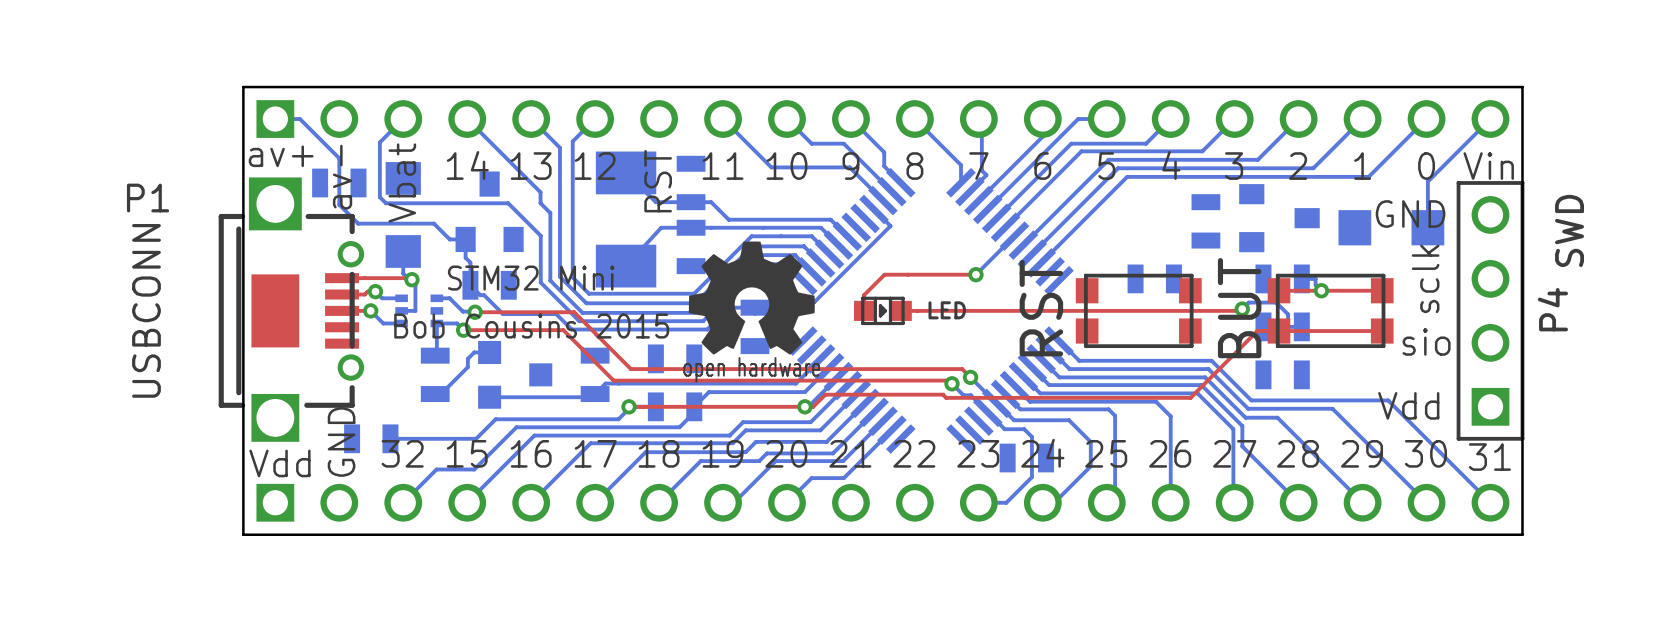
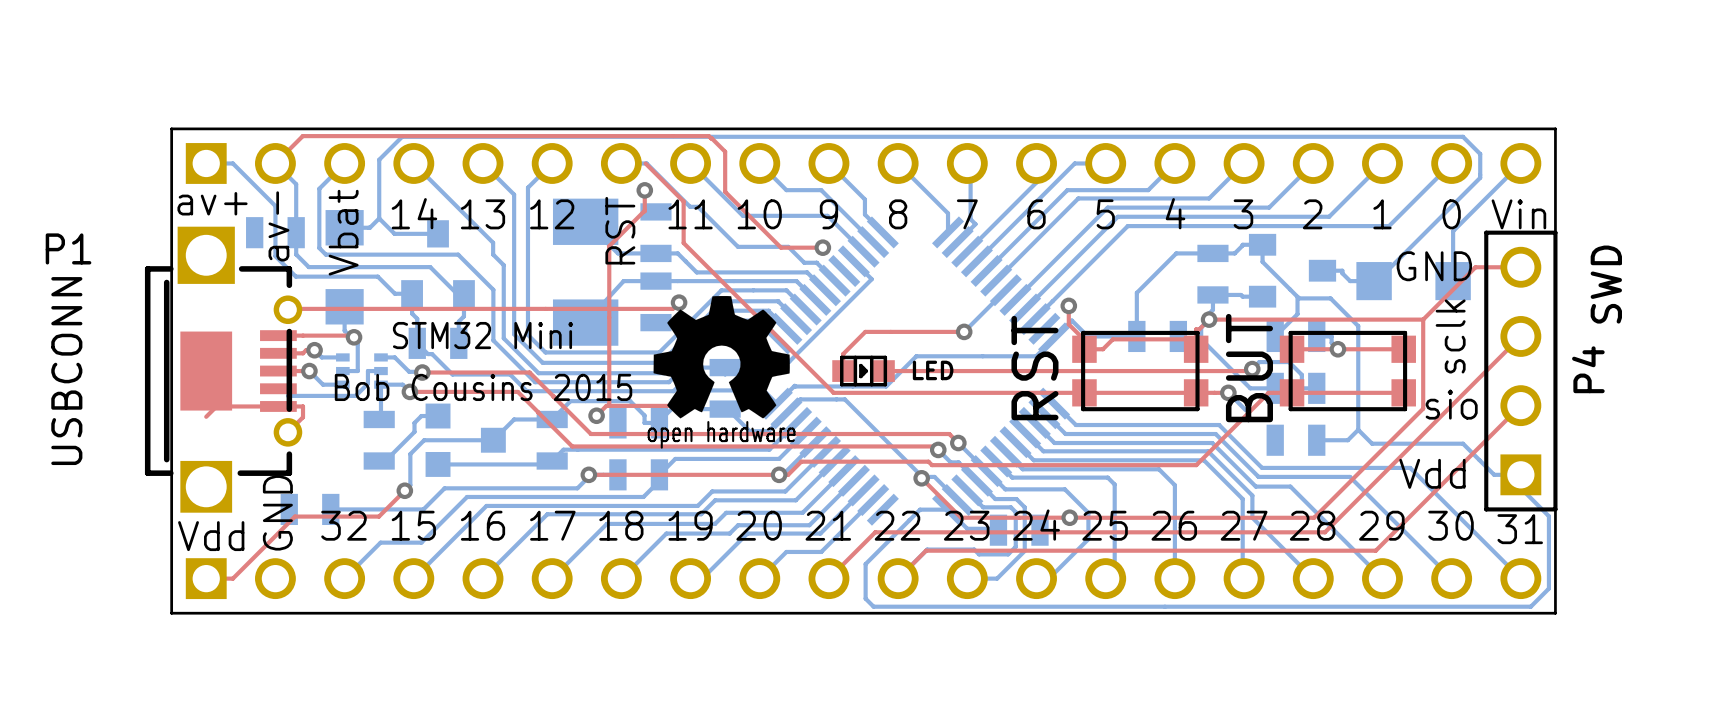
bottom track: none -> (275, 163) (296, 184) (296, 254) (308, 267) (430, 267) (456, 293) (463, 293) (463, 316) (458, 321) (458, 343)
top track: none -> (275, 163) (302, 136) (708, 136) (725, 151) (725, 191) (781, 247) (822, 247)
bottom track: none -> (621, 163) (646, 163) (690, 206) (697, 206) (738, 246) (788, 246) (804, 262) (816, 262) (834, 280)
top track: none -> (645, 163) (683, 201) (683, 243) (833, 392) (1228, 392)
top track: none -> (644, 190) (644, 211)
via: none -> (644, 190)
top track: none -> (644, 210) (609, 246) (609, 405)
bottom track: none -> (379, 218) (379, 159) (402, 136) (1463, 136) (1480, 154) (1480, 177) (1376, 281) (1350, 281) (1342, 273) (1342, 270) (1322, 270)
bottom track: none -> (379, 218) (369, 227) (344, 227)
bottom track: none -> (379, 218) (394, 233) (438, 233)
via: none -> (822, 247)
top track: none -> (1520, 267) (1475, 267) (1423, 319)
bottom track: none -> (1262, 296) (1212, 294) (1212, 309) (1209, 313) (1209, 319) (1201, 327) (1201, 339) (1250, 388) (1275, 388)
bottom track: none -> (1297, 296) (1297, 314) (1275, 336)
top track: none -> (679, 302) (672, 308) (287, 309)
via: none -> (679, 302)
top track: none -> (1068, 305) (1068, 324) (1093, 349)
via: none -> (1068, 305)
via: none -> (1209, 319)
top track: none -> (1423, 319) (1423, 408) (1314, 517) (1097, 517)
top track: none -> (1423, 319) (1209, 319) (1199, 329) (1196, 329) (1196, 349)
top track: none -> (1520, 336) (1324, 532) (875, 532) (828, 578)
top track: none -> (1196, 339) (1112, 339) (1102, 349) (1084, 349)
bottom track: none -> (380, 371) (367, 371) (367, 383) (355, 395) (287, 395)
bottom track: none -> (1228, 392) (1245, 410)
via: none -> (1228, 392)
top track: none -> (1520, 405) (1375, 550) (926, 550) (898, 578)
bottom track: none -> (697, 405) (700, 409) (725, 409) (725, 406) (749, 431) (768, 431) (800, 399) (844, 399) (921, 478) (934, 476) (957, 500)
top track: none -> (697, 405) (606, 405) (596, 415)
via: none -> (596, 415)
top track: none -> (206, 416) (216, 406) (303, 406) (303, 417) (287, 432)
bottom track: none -> (1358, 429) (1372, 443) (1463, 443) (1494, 474) (1520, 474)
bottom track: none -> (1358, 429) (1358, 326) (1330, 298) (1299, 298) (1262, 261) (1262, 244) (1242, 244) (1234, 253) (1176, 253) (1136, 292) (1136, 336) (1087, 336) (1071, 320) (1036, 356) (916, 356) (886, 386) (794, 385) (776, 403) (763, 390) (690, 390) (659, 422) (644, 422) (644, 415) (630, 401) (570, 401) (552, 419) (514, 419) (493, 440) (424, 440) (410, 454) (410, 485) (404, 490)
bottom track: none -> (1358, 429) (1347, 440) (1316, 440)
bottom track: none -> (1507, 474) (1548, 516) (1548, 588) (1530, 606) (873, 606) (865, 598) (865, 564) (920, 509) (948, 509) (967, 528) (998, 530)
top track: none -> (921, 478) (961, 517) (1097, 517)
via: none -> (921, 478)
top track: none -> (404, 490) (379, 516) (294, 516) (232, 578) (206, 578)
via: none -> (404, 490)
bottom track: none -> (967, 490) (983, 507) (1010, 507) (1015, 512) (1015, 546) (1008, 554) (979, 554) (974, 549) (927, 549) (898, 578)
via: none -> (1069, 517)

